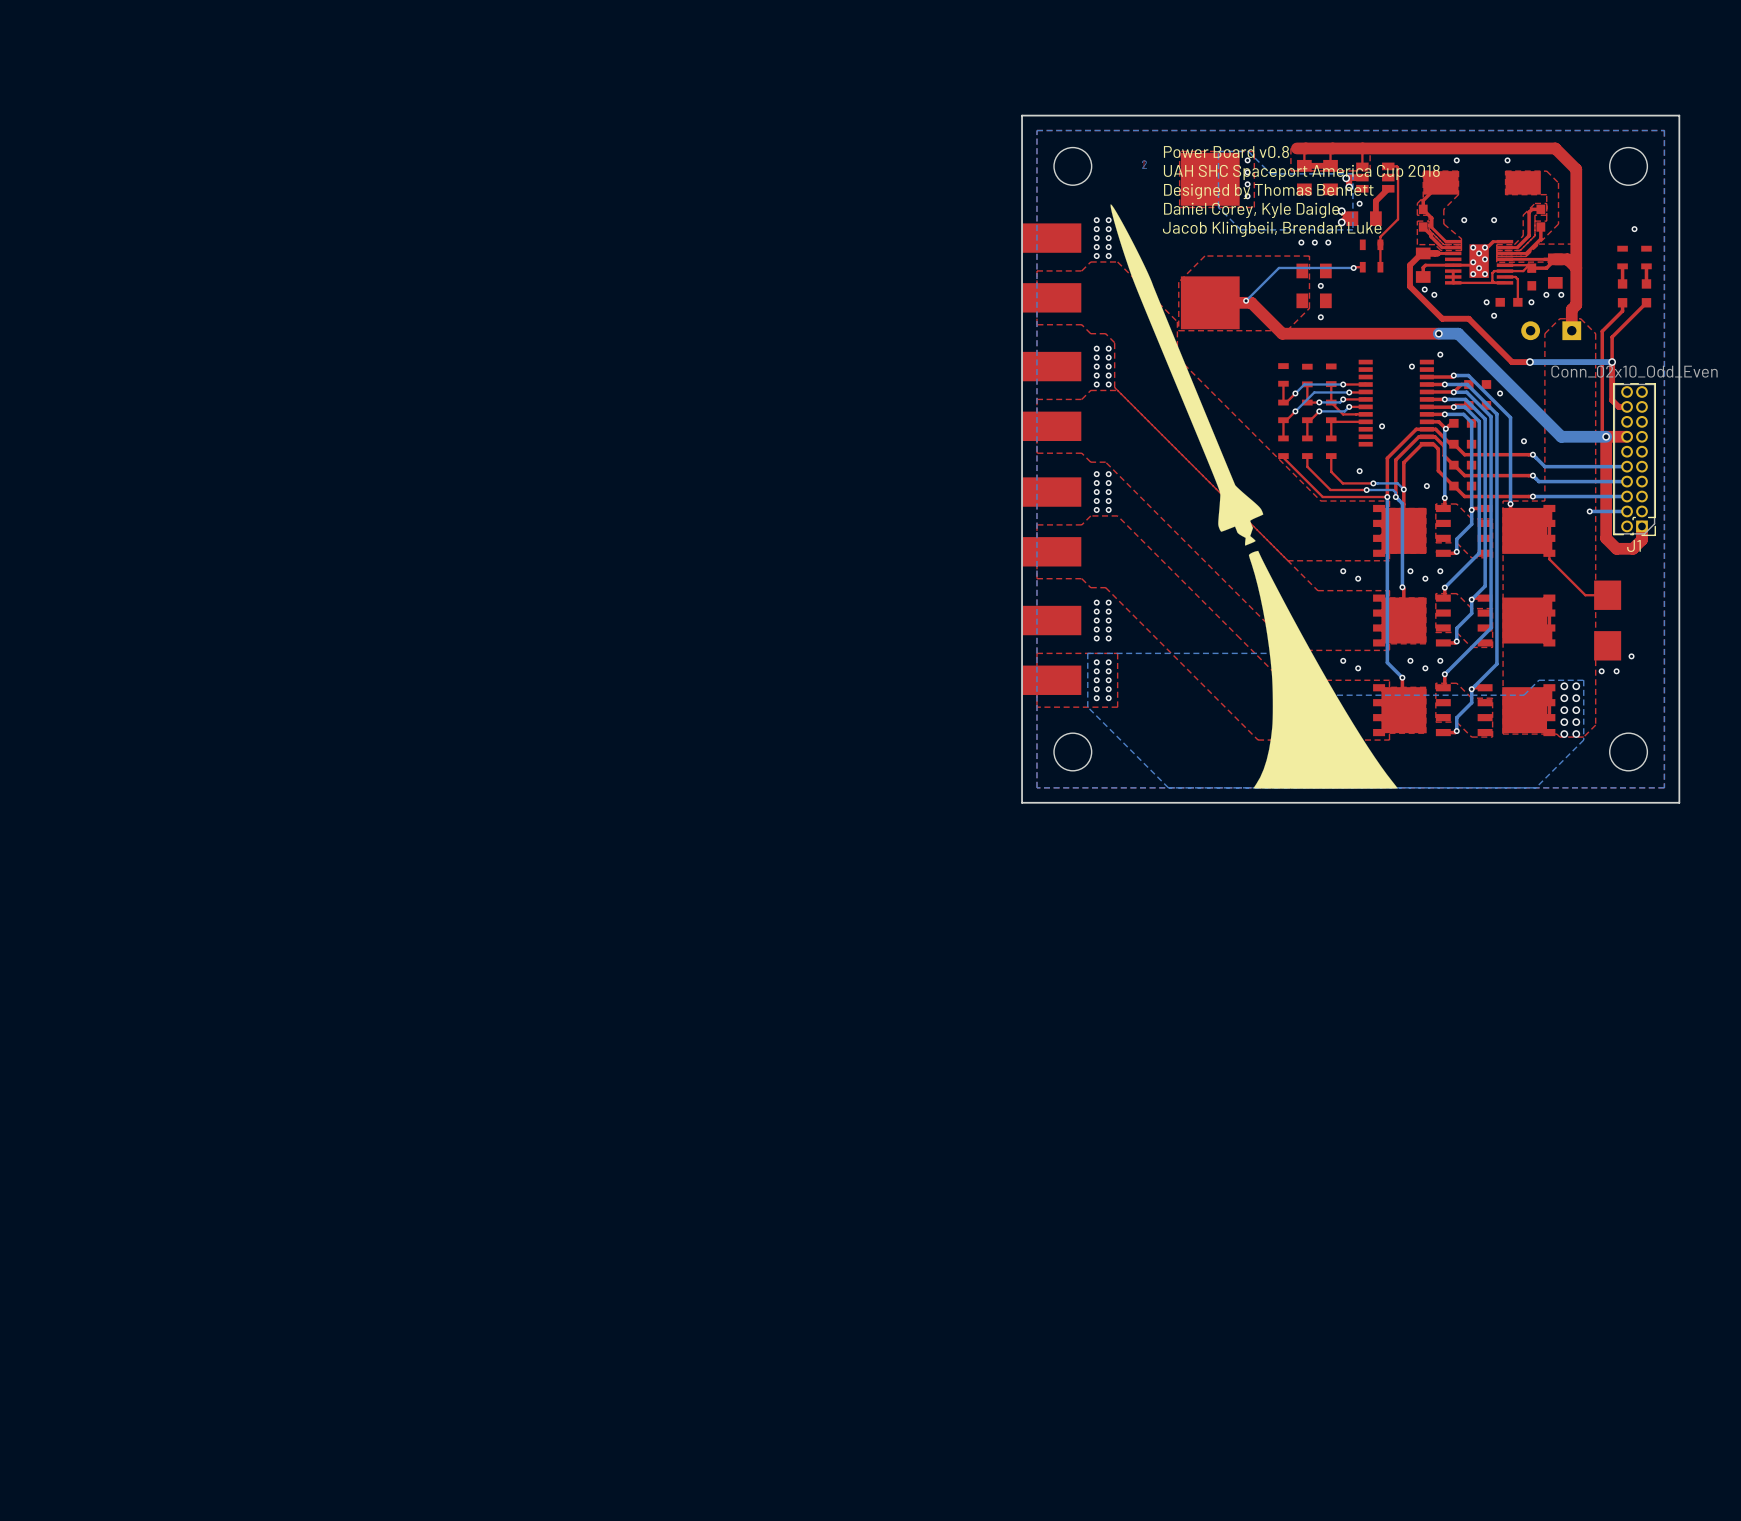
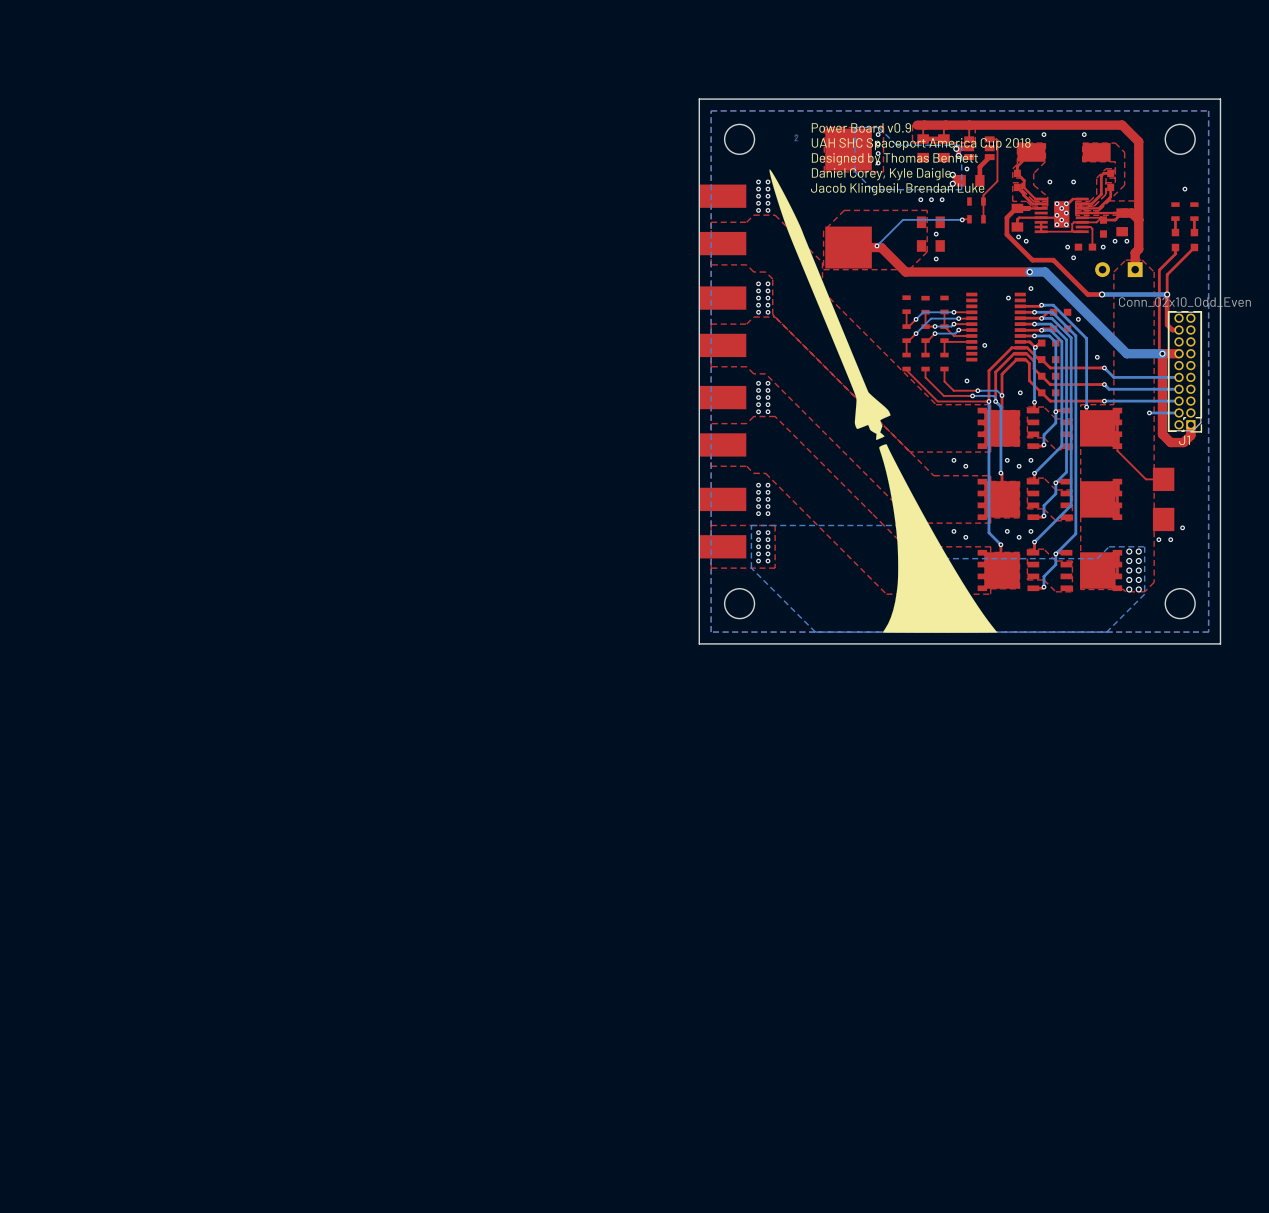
text: Power Board v0.8 (1226, 151) -> Power Board v0.9 (861, 127)

